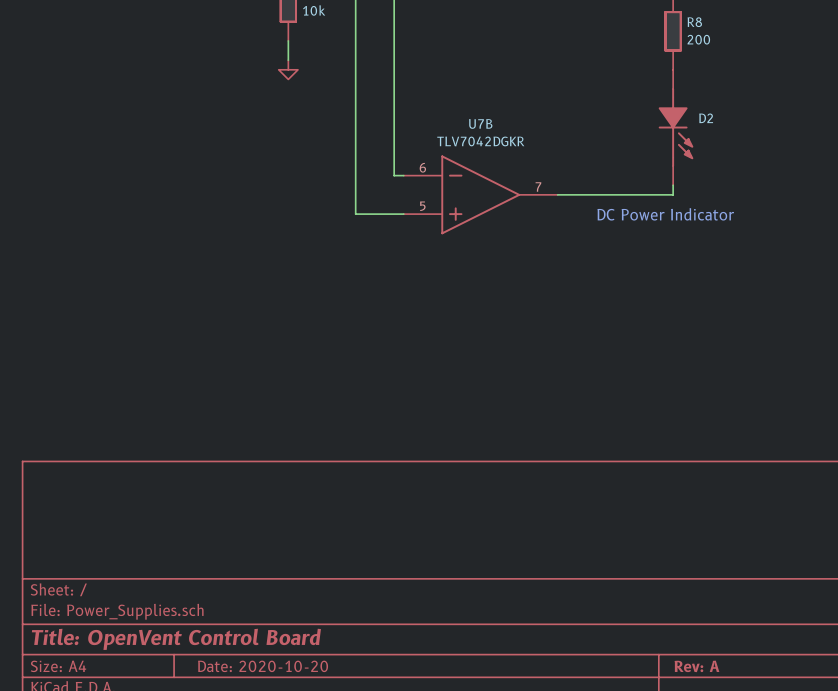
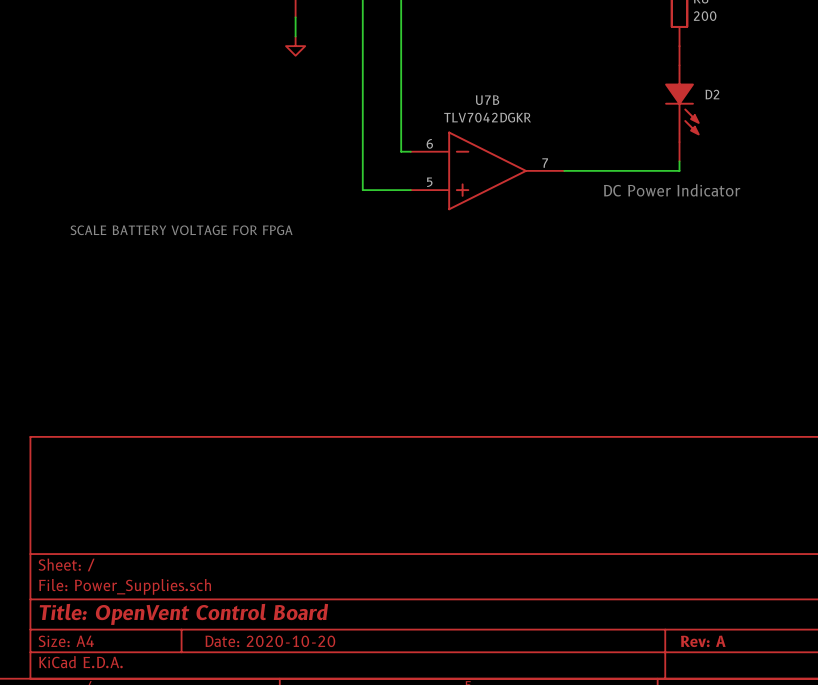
text: none -> SCALE BATTERY VOLTAGE FOR FPGA (181, 230)

